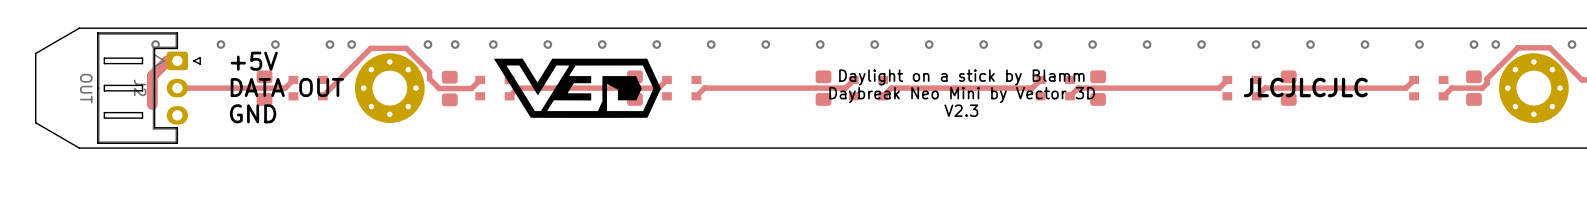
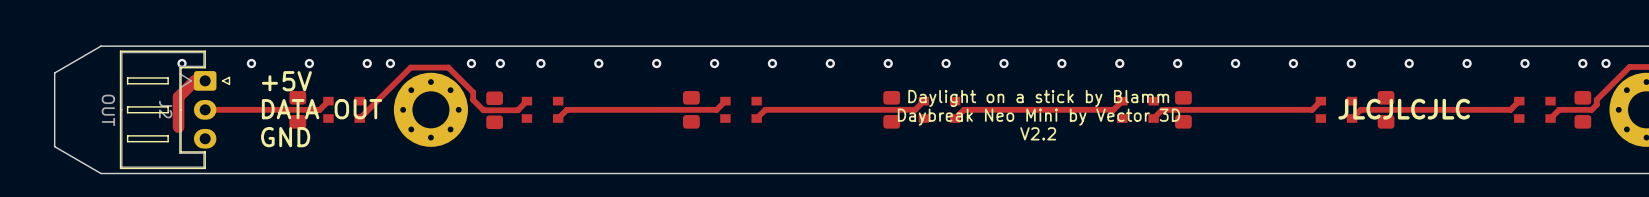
drawing: [494, 58, 661, 118] -> none
text: V2.3 (961, 110) -> V2.2 (1038, 133)

